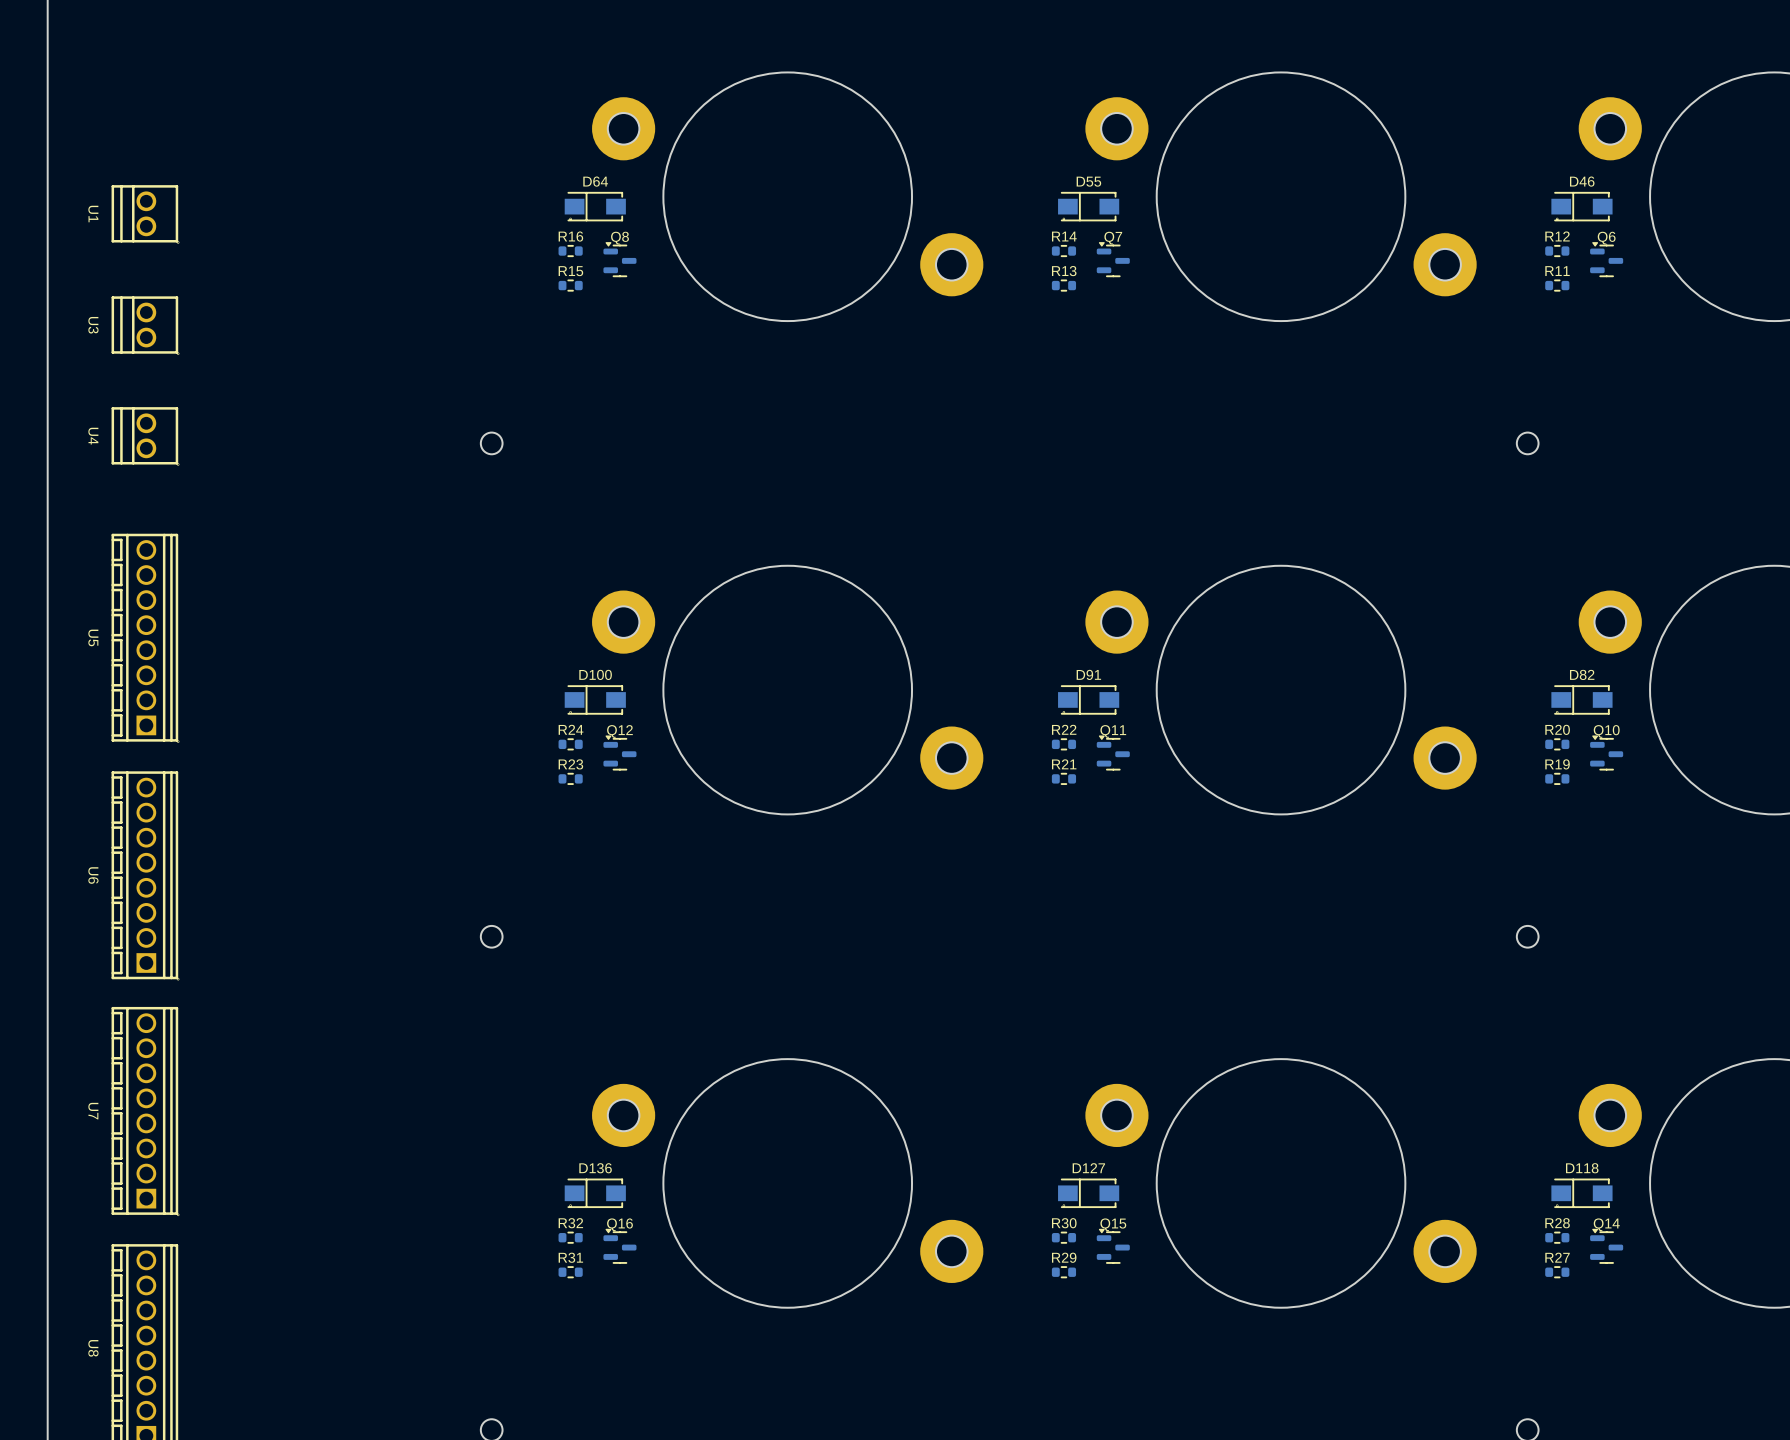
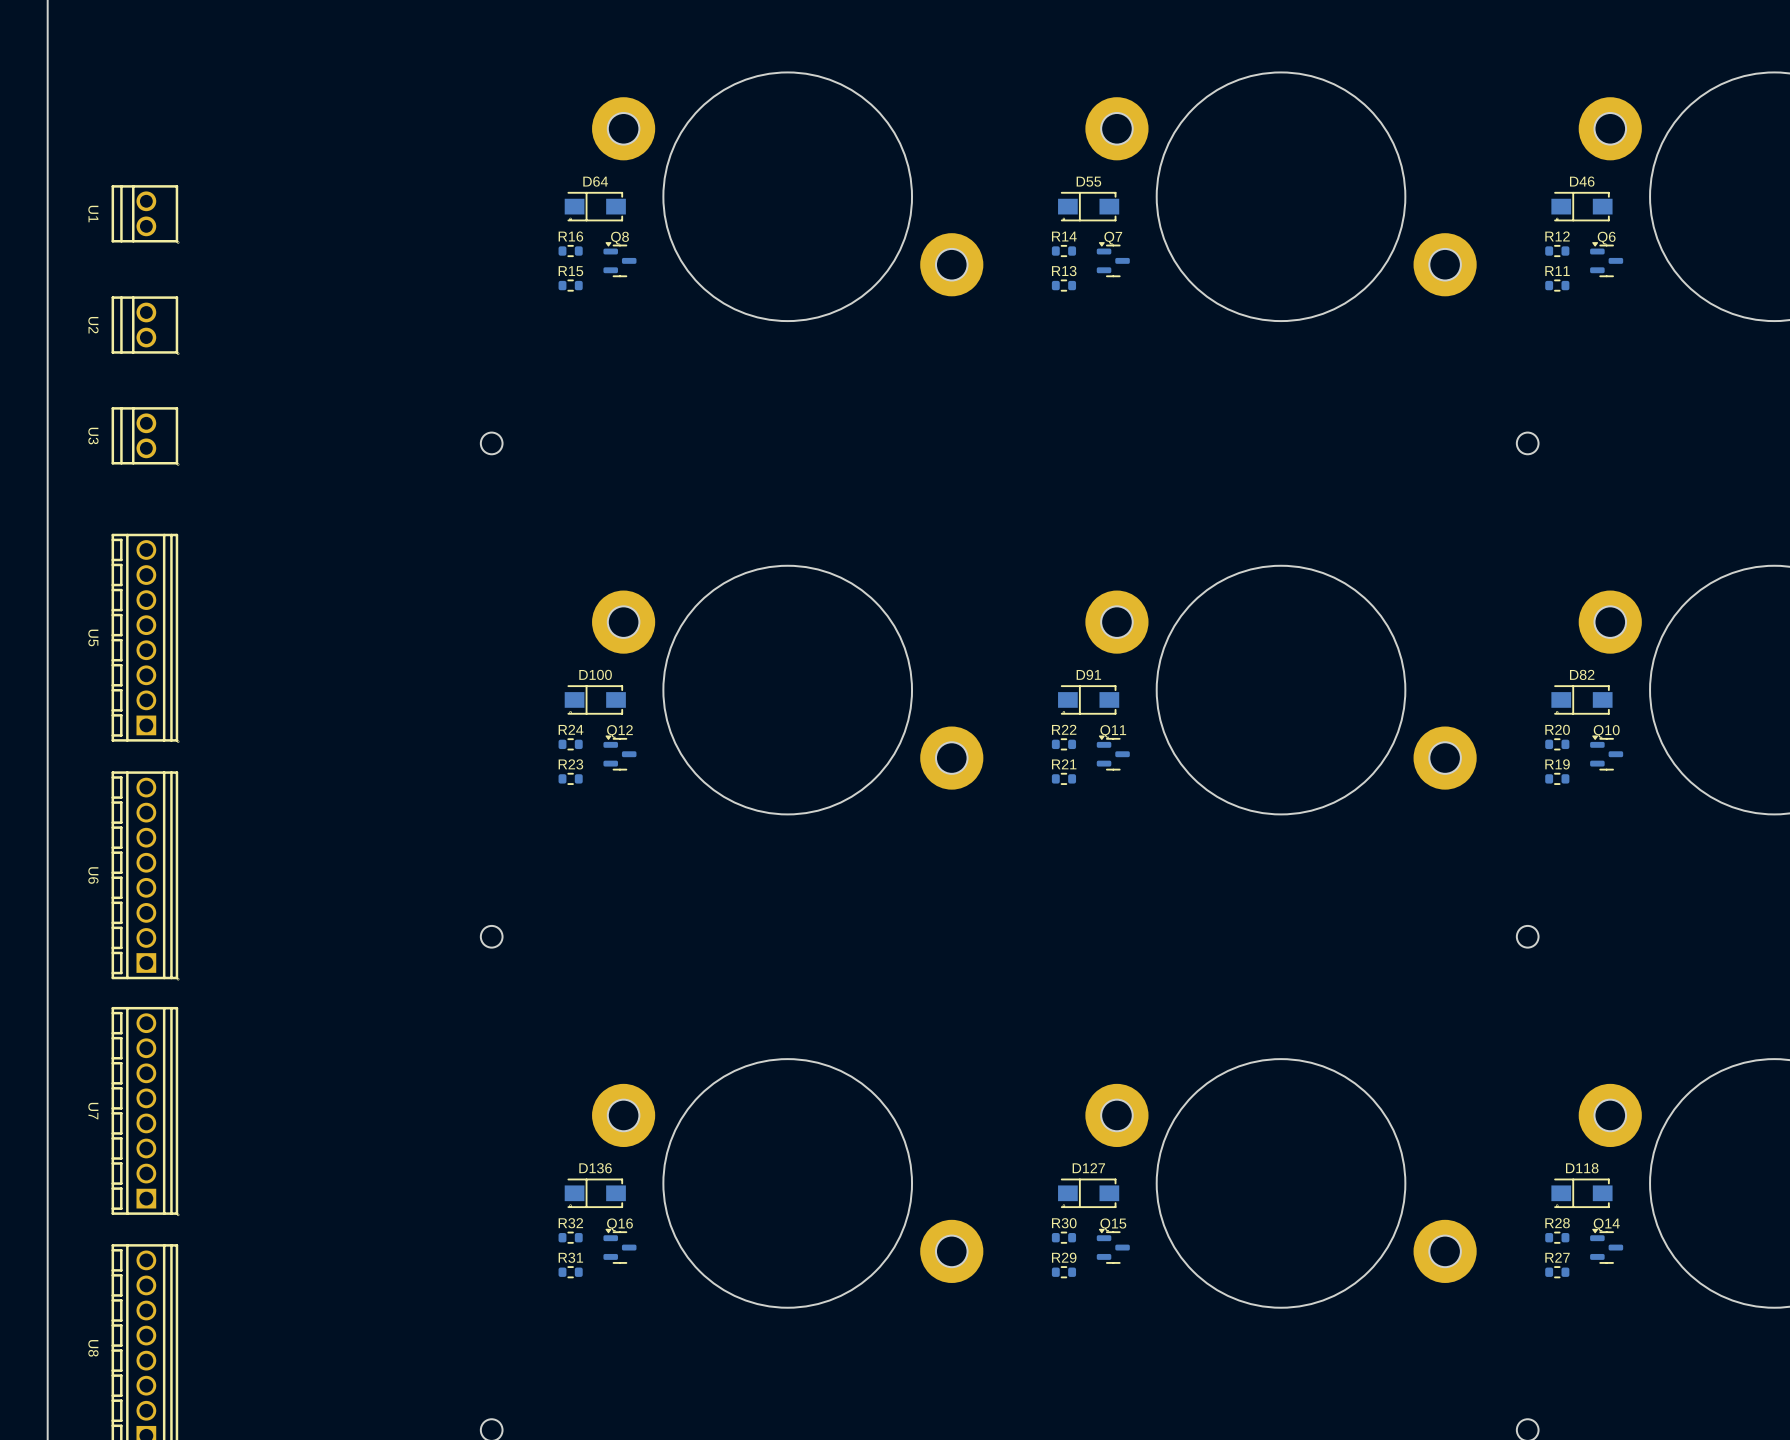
U3 name: U3 (93, 325) -> U2 (93, 325)
U4 name: U4 (93, 436) -> U3 (93, 436)

